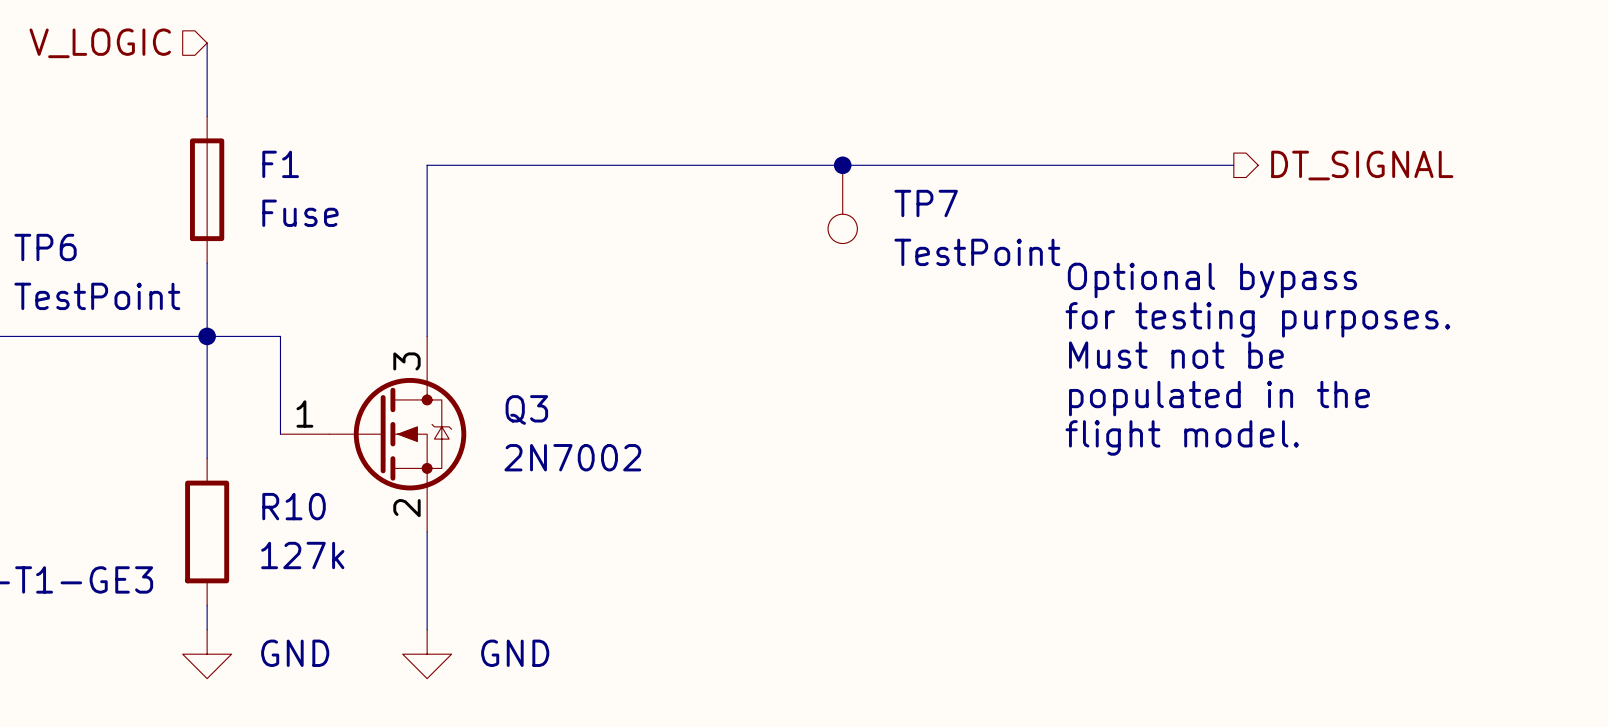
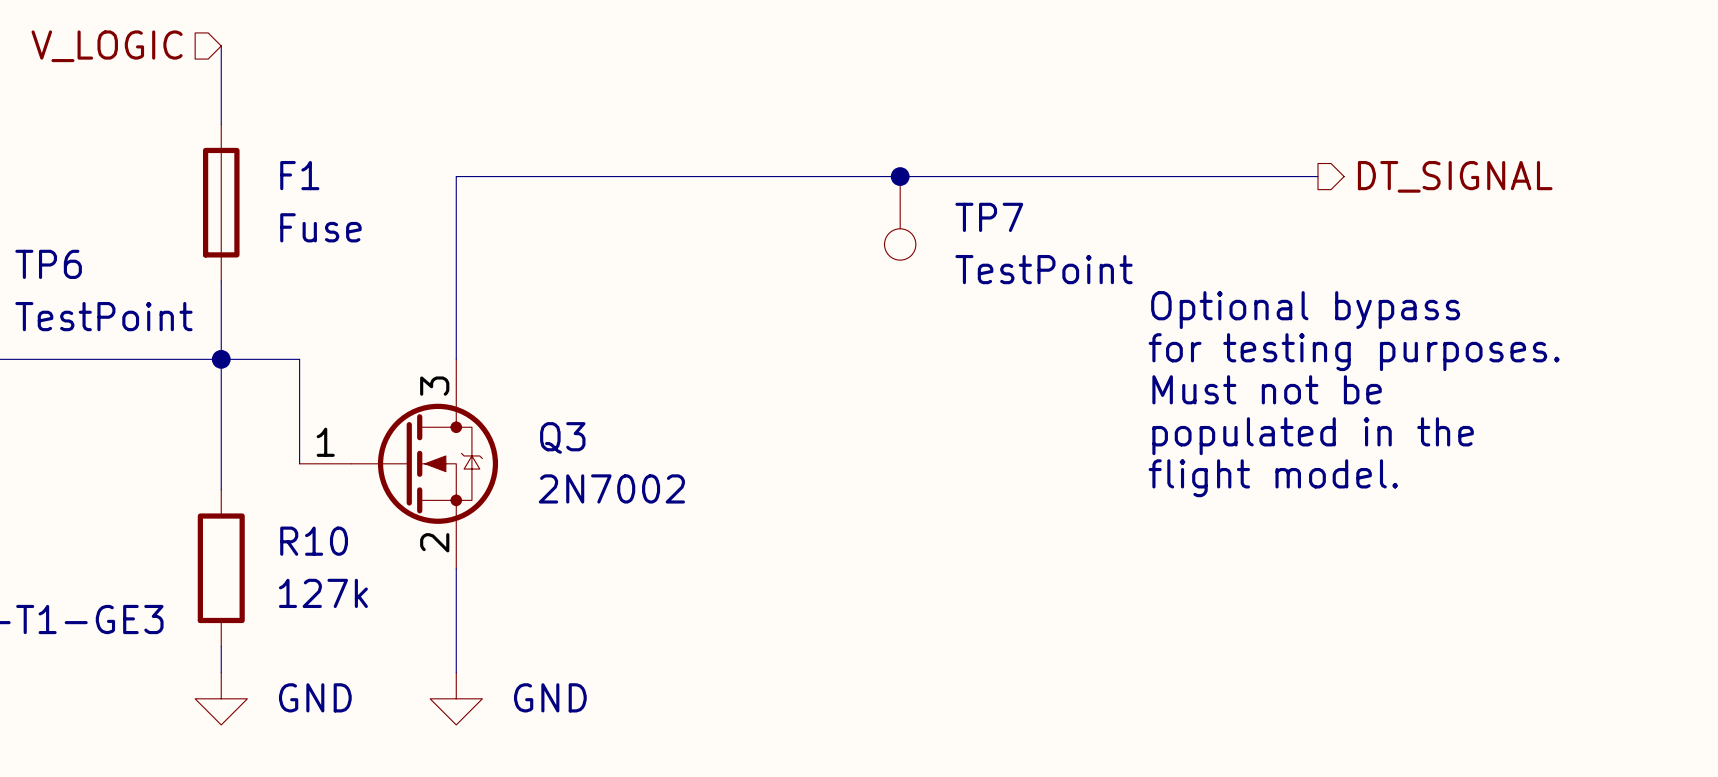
text position: Optional bypass (1212, 280) -> Optional bypass (1305, 310)
text position: for testing purposes. (1257, 319) -> for testing purposes. (1354, 352)
text position: Must not be (1176, 355) -> Must not be (1267, 389)
text position: populated in the (1219, 398) -> populated in the (1313, 436)
text position: flight model. (1182, 437) -> flight model. (1273, 478)

